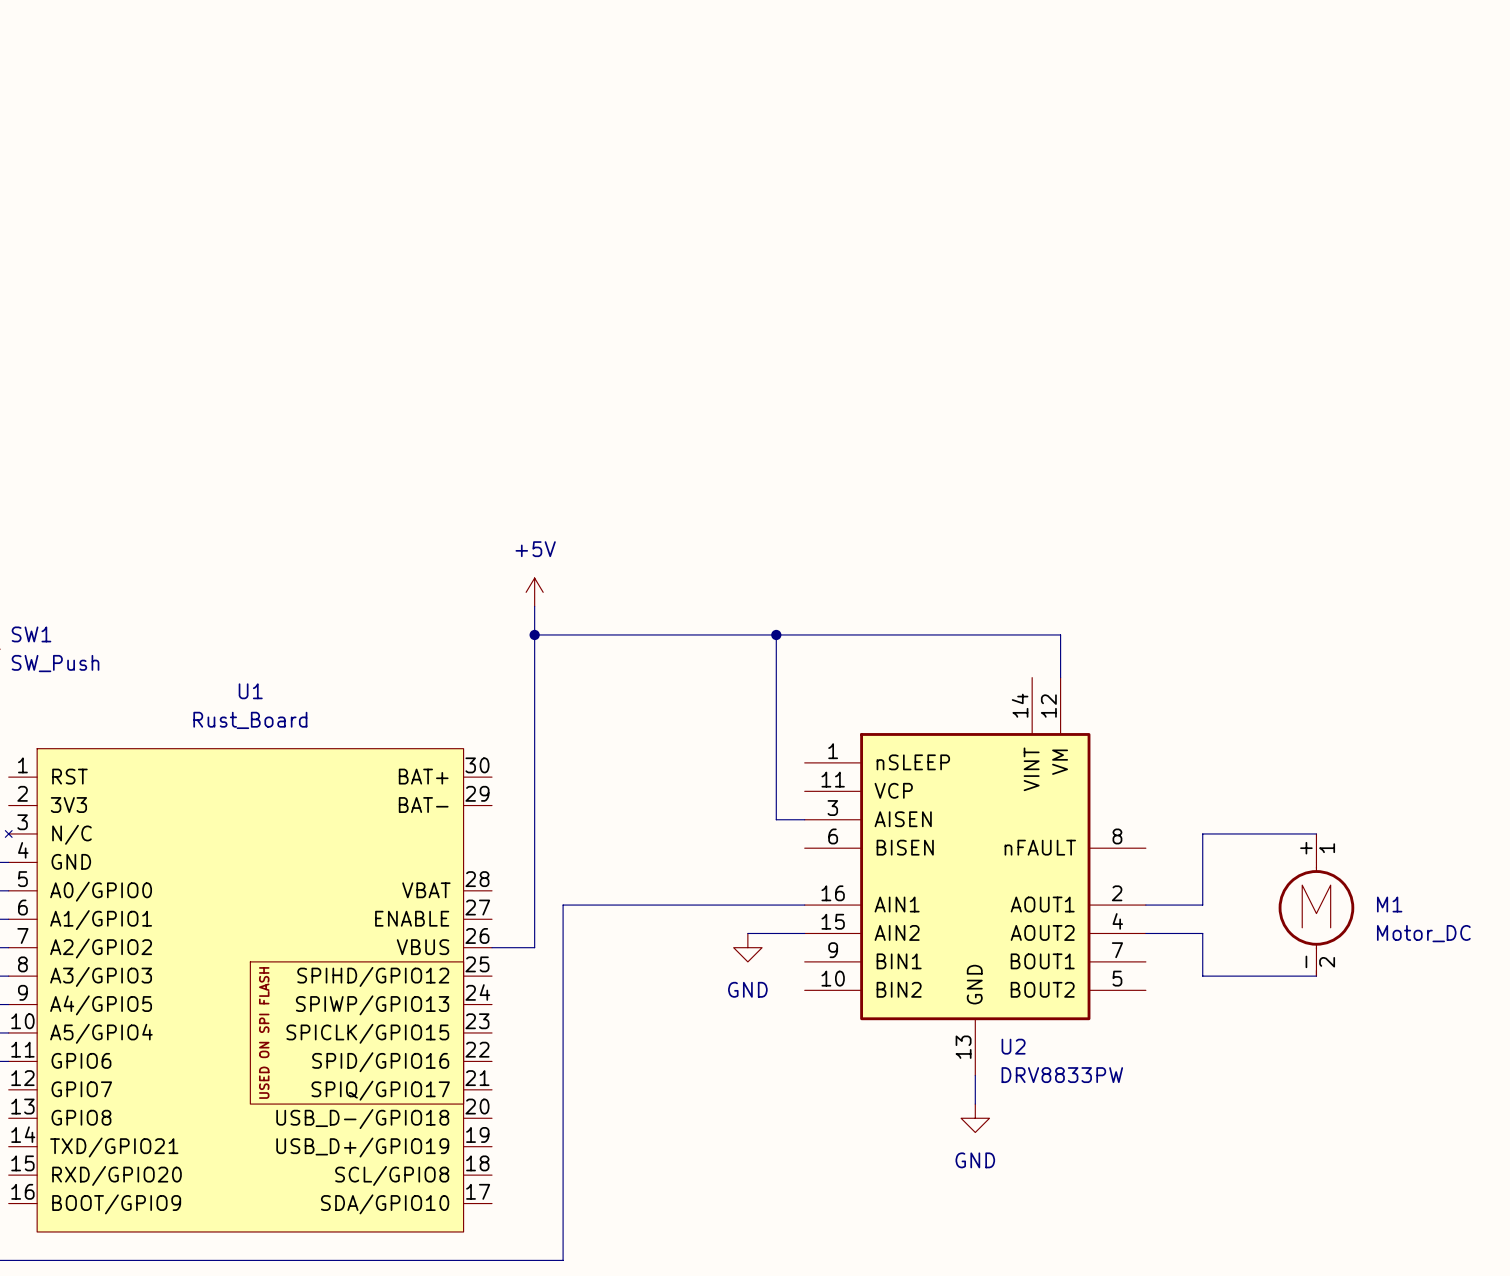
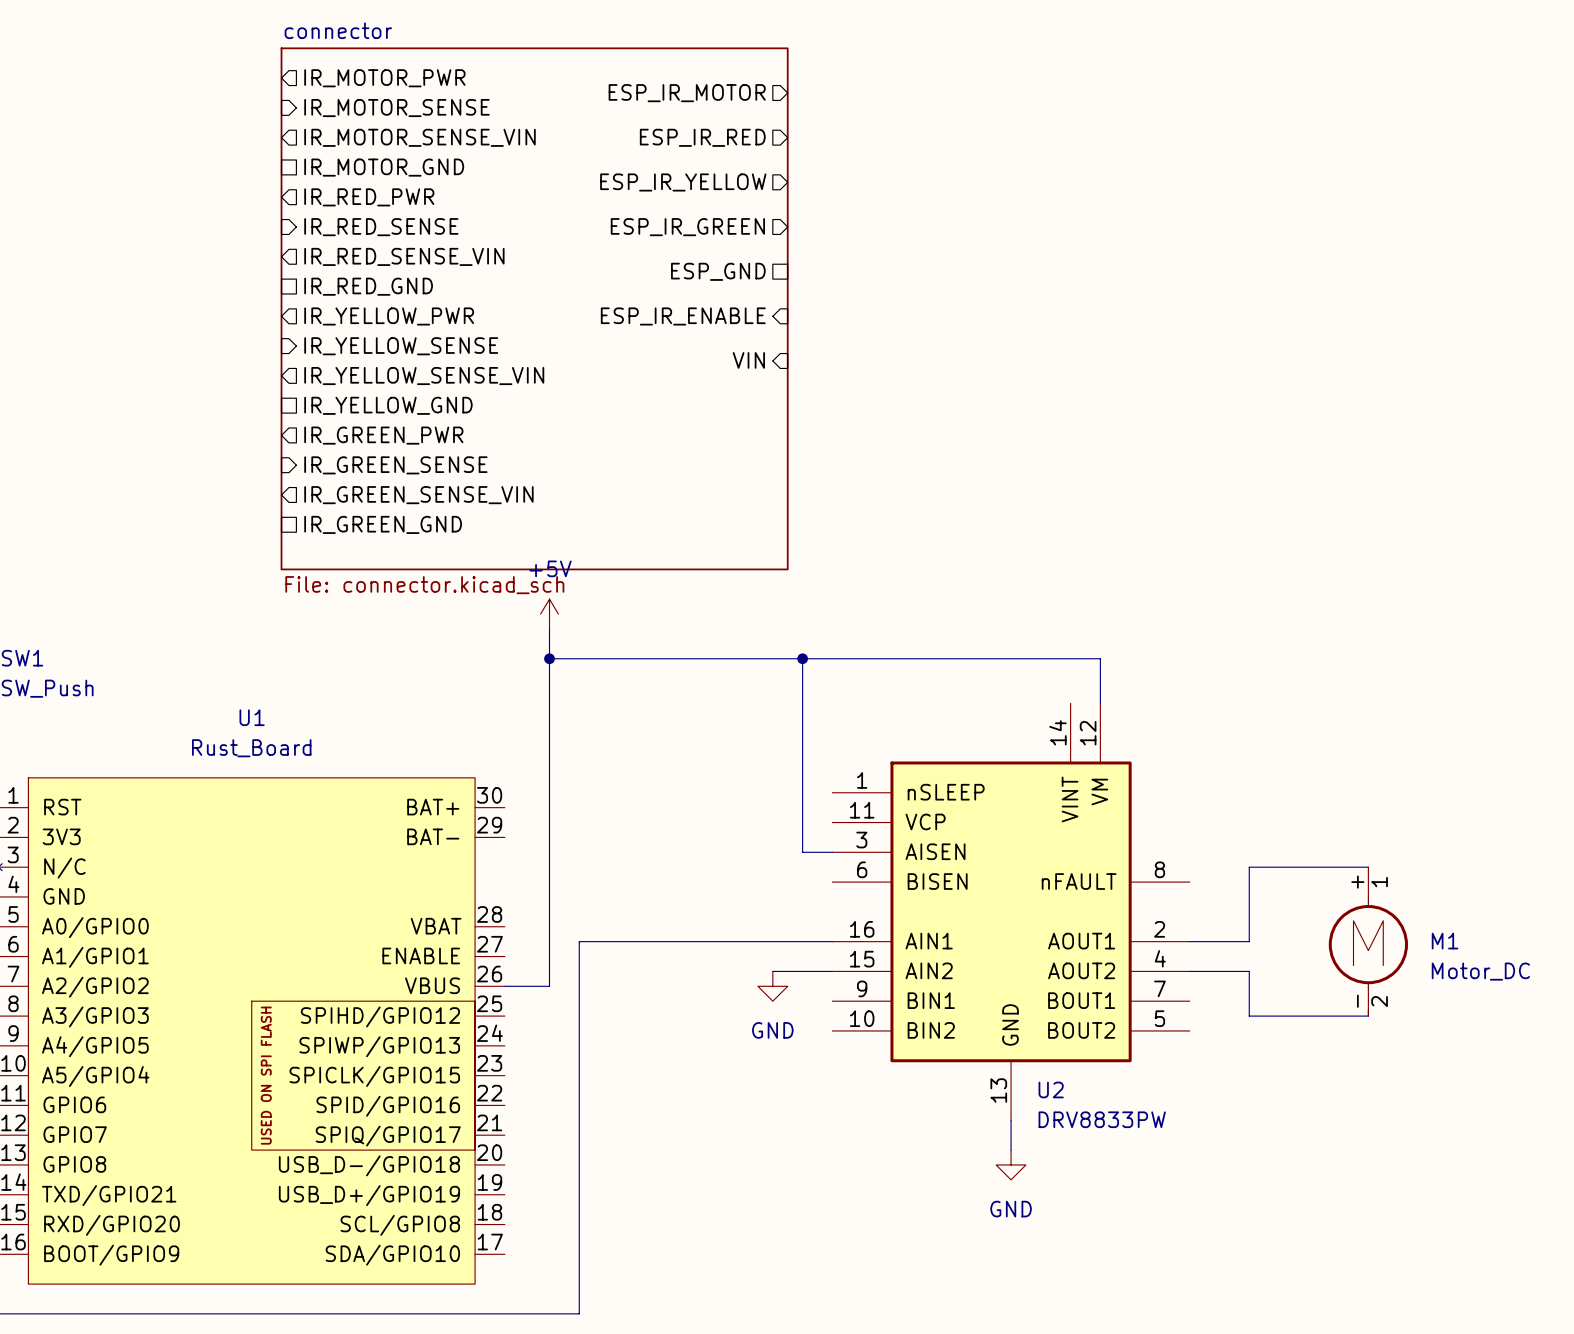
sheet pin: none -> IR_MOTOR_PWR (384, 78)
sheet pin: none -> ESP_IR_MOTOR (687, 93)
sheet pin: none -> IR_MOTOR_SENSE (396, 108)
sheet pin: none -> IR_MOTOR_SENSE_VIN (419, 137)
sheet pin: none -> ESP_IR_RED (702, 137)
sheet pin: none -> IR_MOTOR_GND (384, 167)
sheet pin: none -> ESP_IR_YELLOW (683, 182)
sheet pin: none -> IR_RED_PWR (369, 197)
sheet pin: none -> IR_RED_SENSE (381, 227)
sheet pin: none -> ESP_IR_GREEN (687, 227)
sheet pin: none -> IR_RED_SENSE_VIN (404, 256)
sheet pin: none -> ESP_GND (718, 271)
sheet pin: none -> IR_RED_GND (368, 286)
sheet connector: none -> File: connector.kicad_sch (534, 308)
sheet pin: none -> IR_YELLOW_PWR (389, 316)
sheet pin: none -> ESP_IR_ENABLE (683, 316)
sheet pin: none -> IR_YELLOW_SENSE (401, 346)
sheet pin: none -> VIN (748, 360)
sheet pin: none -> IR_YELLOW_SENSE_VIN (424, 376)
sheet pin: none -> IR_YELLOW_GND (388, 405)
sheet pin: none -> IR_GREEN_PWR (383, 435)
sheet pin: none -> IR_GREEN_SENSE (395, 465)
sheet pin: none -> IR_GREEN_SENSE_VIN (418, 495)
sheet pin: none -> IR_GREEN_GND (383, 524)

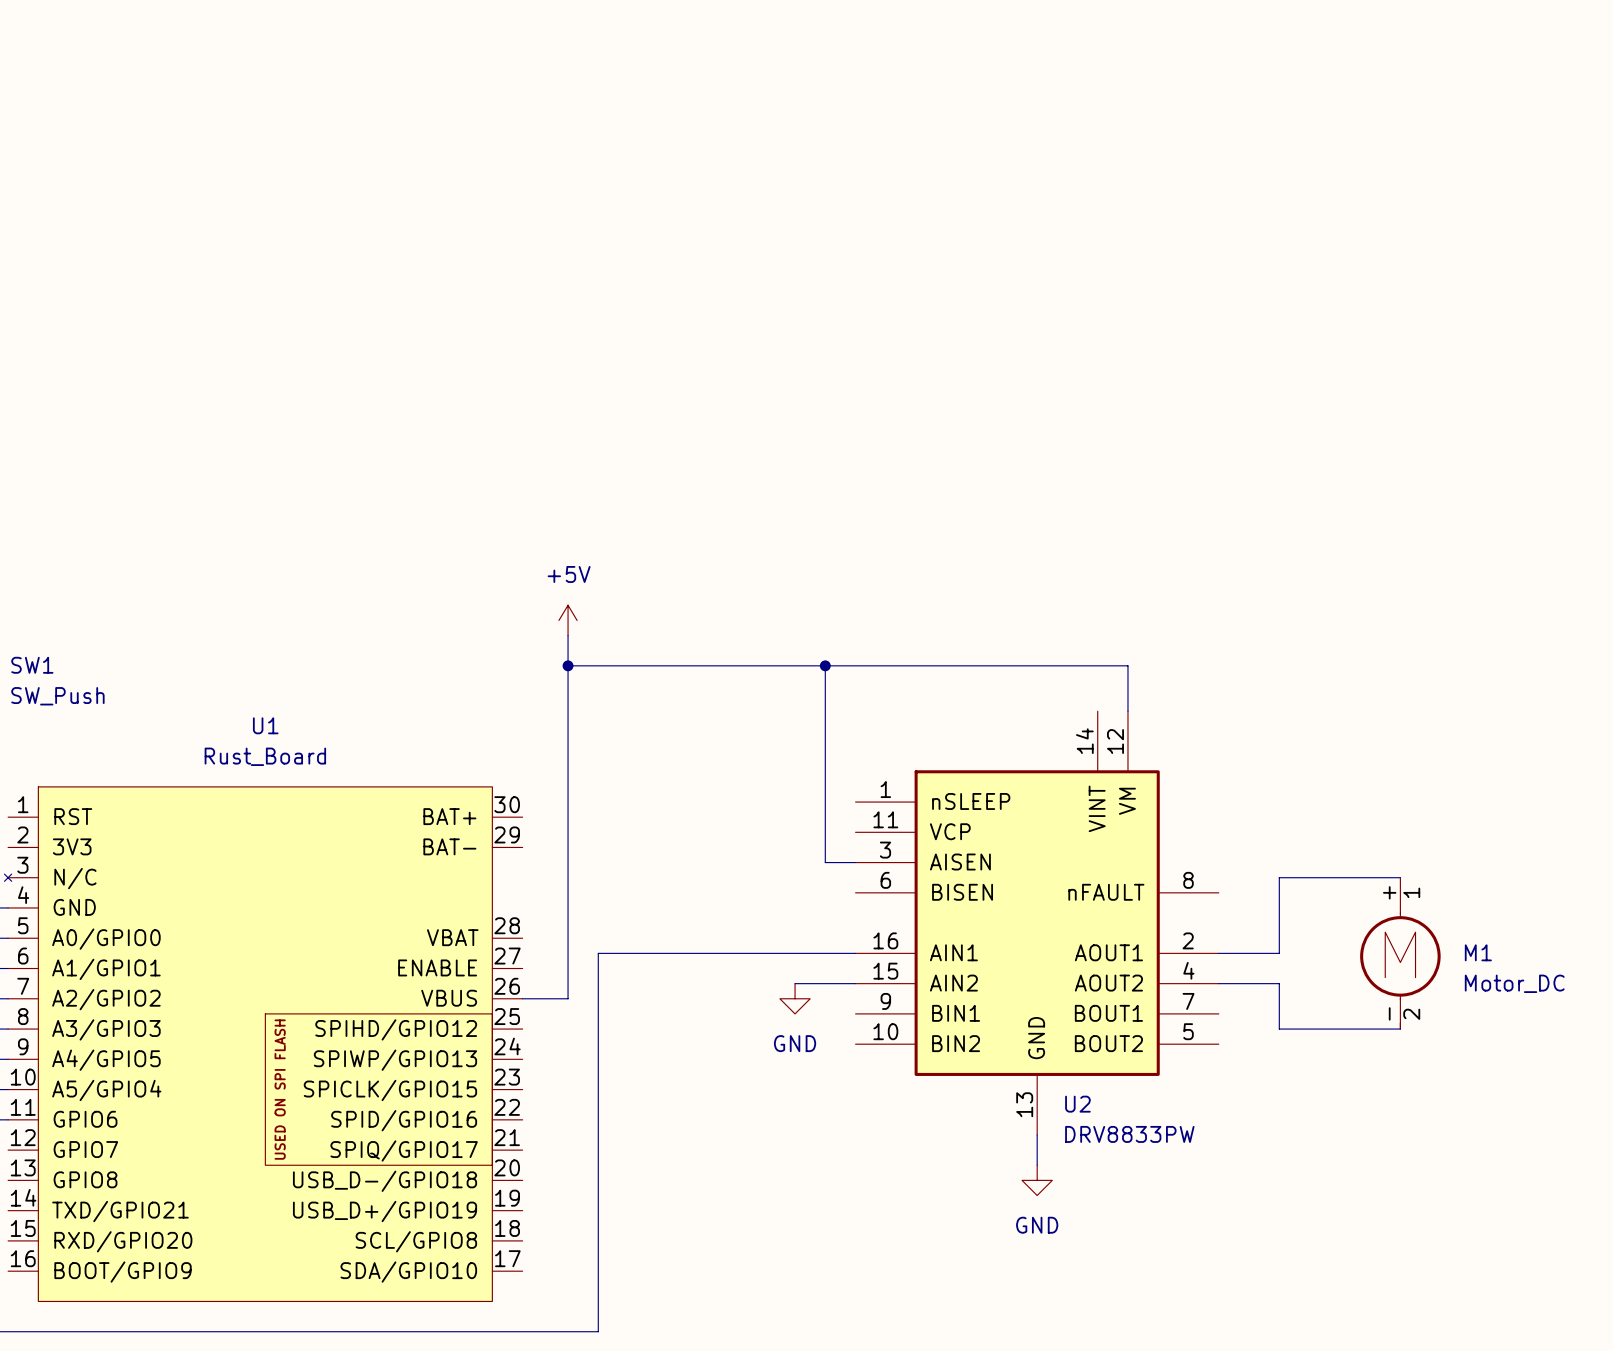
sheet pin: IR_MOTOR_PWR (384, 78) -> none
sheet pin: ESP_IR_MOTOR (687, 93) -> none
sheet pin: IR_MOTOR_SENSE (396, 108) -> none
sheet pin: IR_MOTOR_SENSE_VIN (419, 137) -> none
sheet pin: ESP_IR_RED (702, 137) -> none
sheet pin: IR_MOTOR_GND (384, 167) -> none
sheet pin: ESP_IR_YELLOW (683, 182) -> none
sheet pin: IR_RED_PWR (369, 197) -> none
sheet pin: IR_RED_SENSE (381, 227) -> none
sheet pin: ESP_IR_GREEN (687, 227) -> none
sheet pin: IR_RED_SENSE_VIN (404, 256) -> none
sheet pin: ESP_GND (718, 271) -> none
sheet pin: IR_RED_GND (368, 286) -> none
sheet connector: File: connector.kicad_sch (534, 308) -> none
sheet pin: IR_YELLOW_PWR (389, 316) -> none
sheet pin: ESP_IR_ENABLE (683, 316) -> none
sheet pin: IR_YELLOW_SENSE (401, 346) -> none
sheet pin: VIN (748, 360) -> none
sheet pin: IR_YELLOW_SENSE_VIN (424, 376) -> none
sheet pin: IR_YELLOW_GND (388, 405) -> none
sheet pin: IR_GREEN_PWR (383, 435) -> none
sheet pin: IR_GREEN_SENSE (395, 465) -> none
sheet pin: IR_GREEN_SENSE_VIN (418, 495) -> none
sheet pin: IR_GREEN_GND (383, 524) -> none

